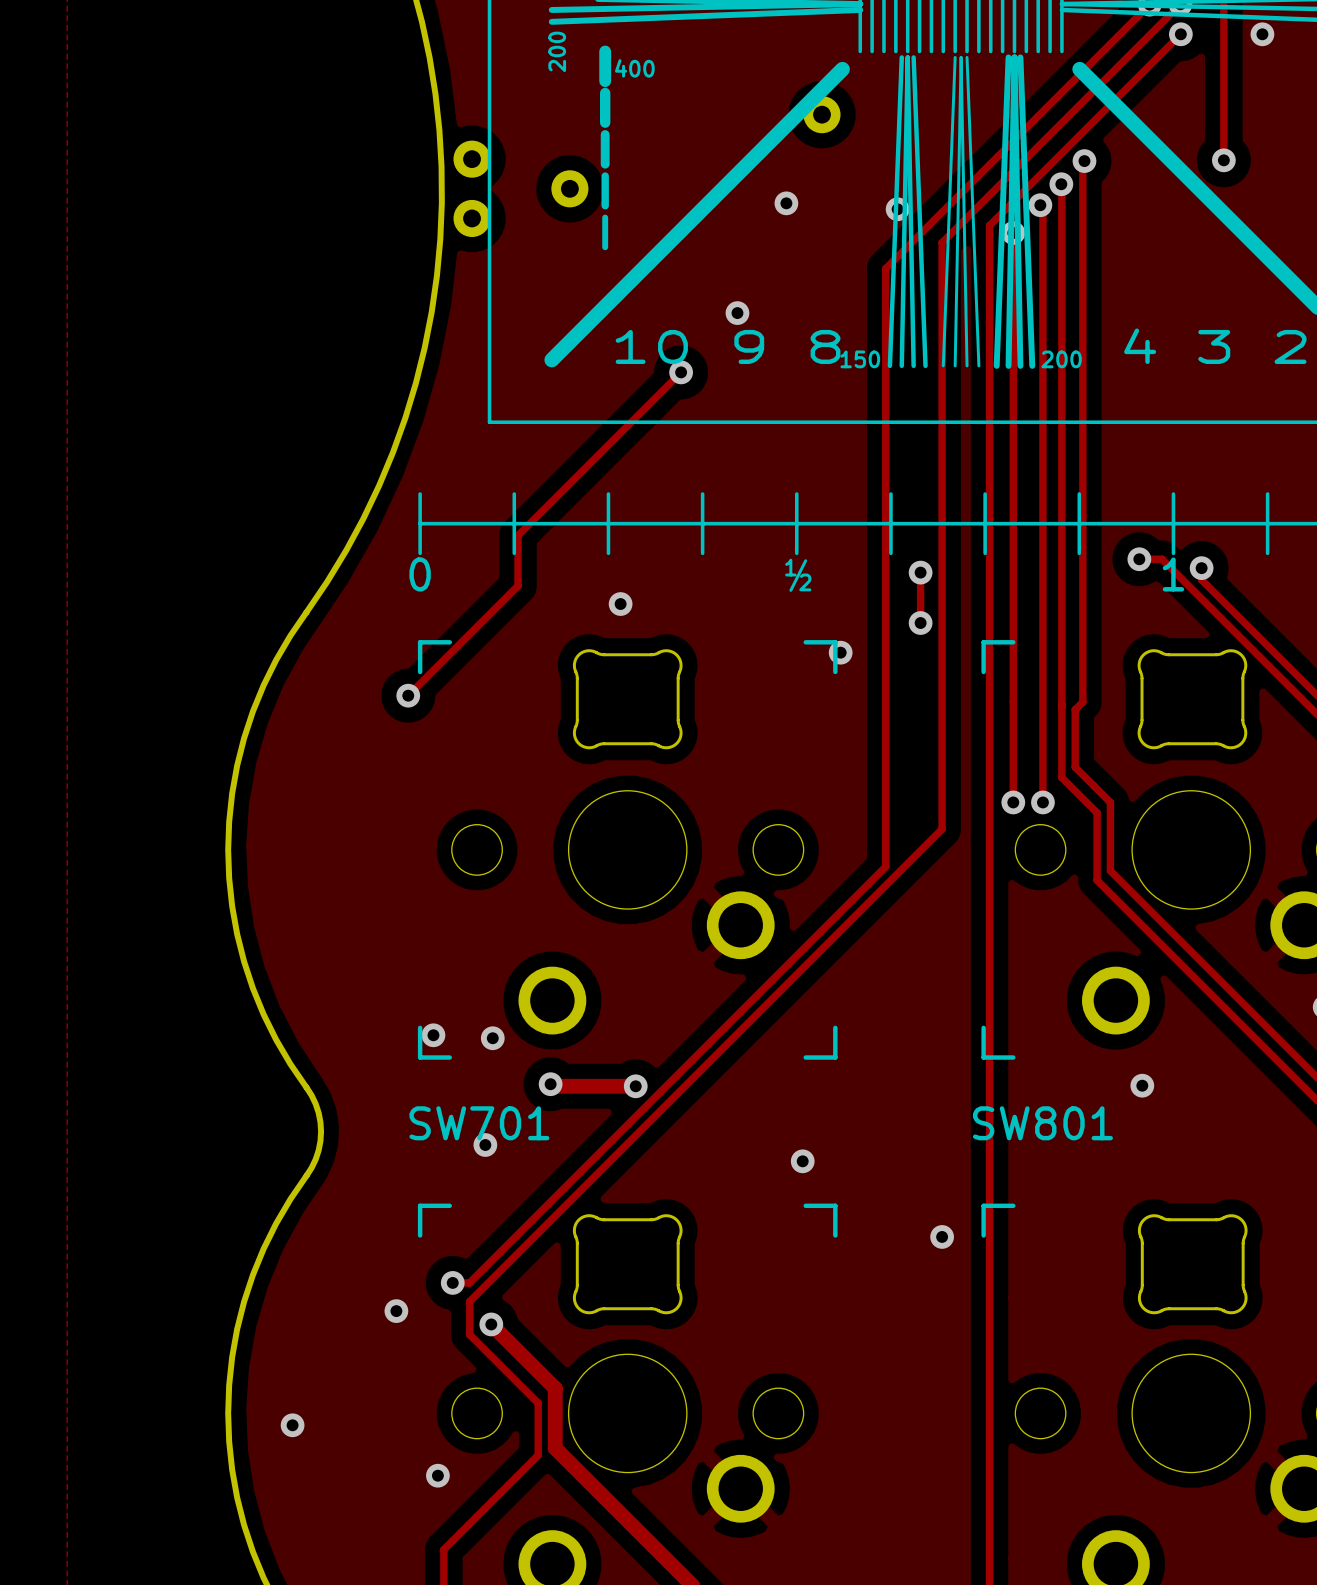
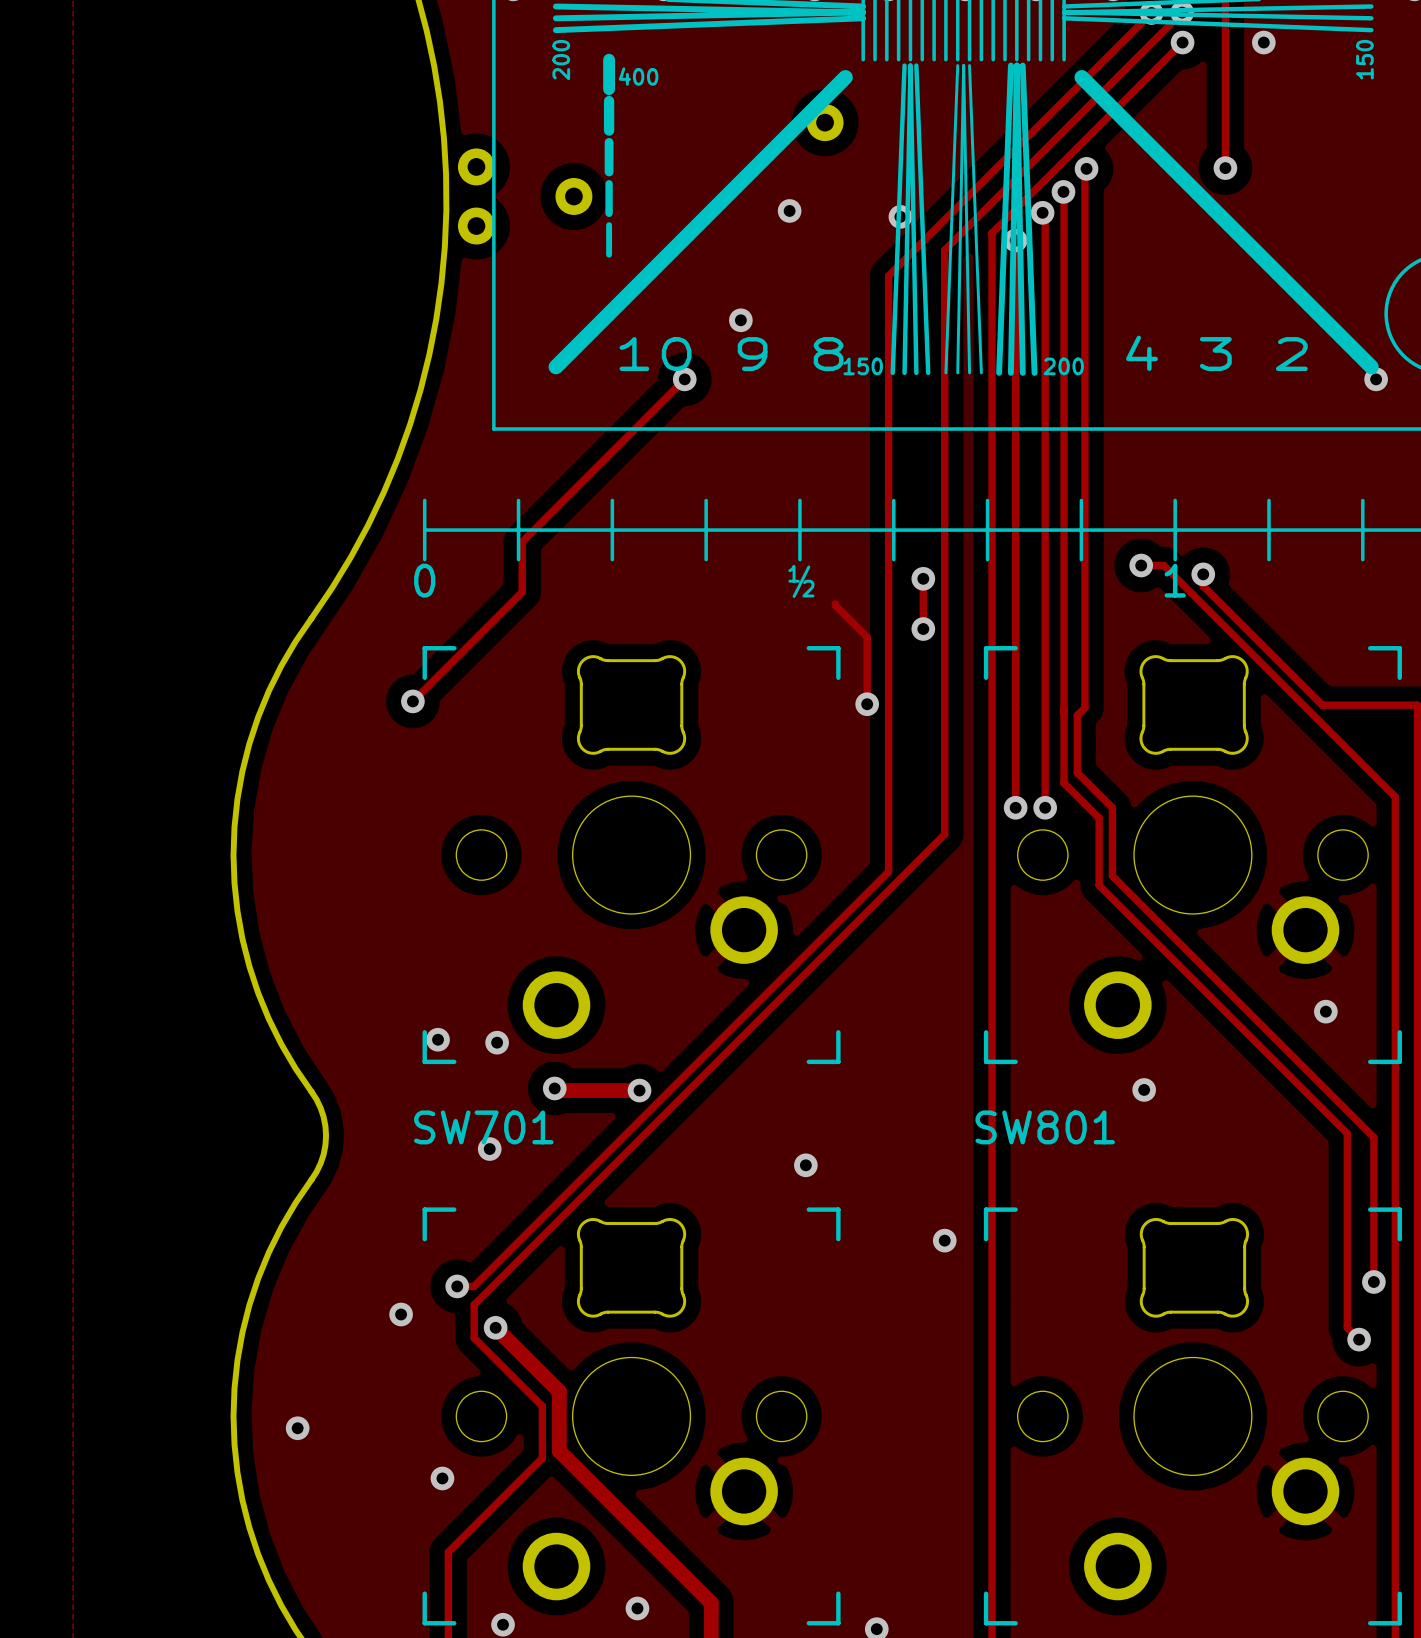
track: none -> (835, 603) (867, 637) (867, 704)
via: (620, 604) -> none
via position: (840, 652) -> (867, 704)

